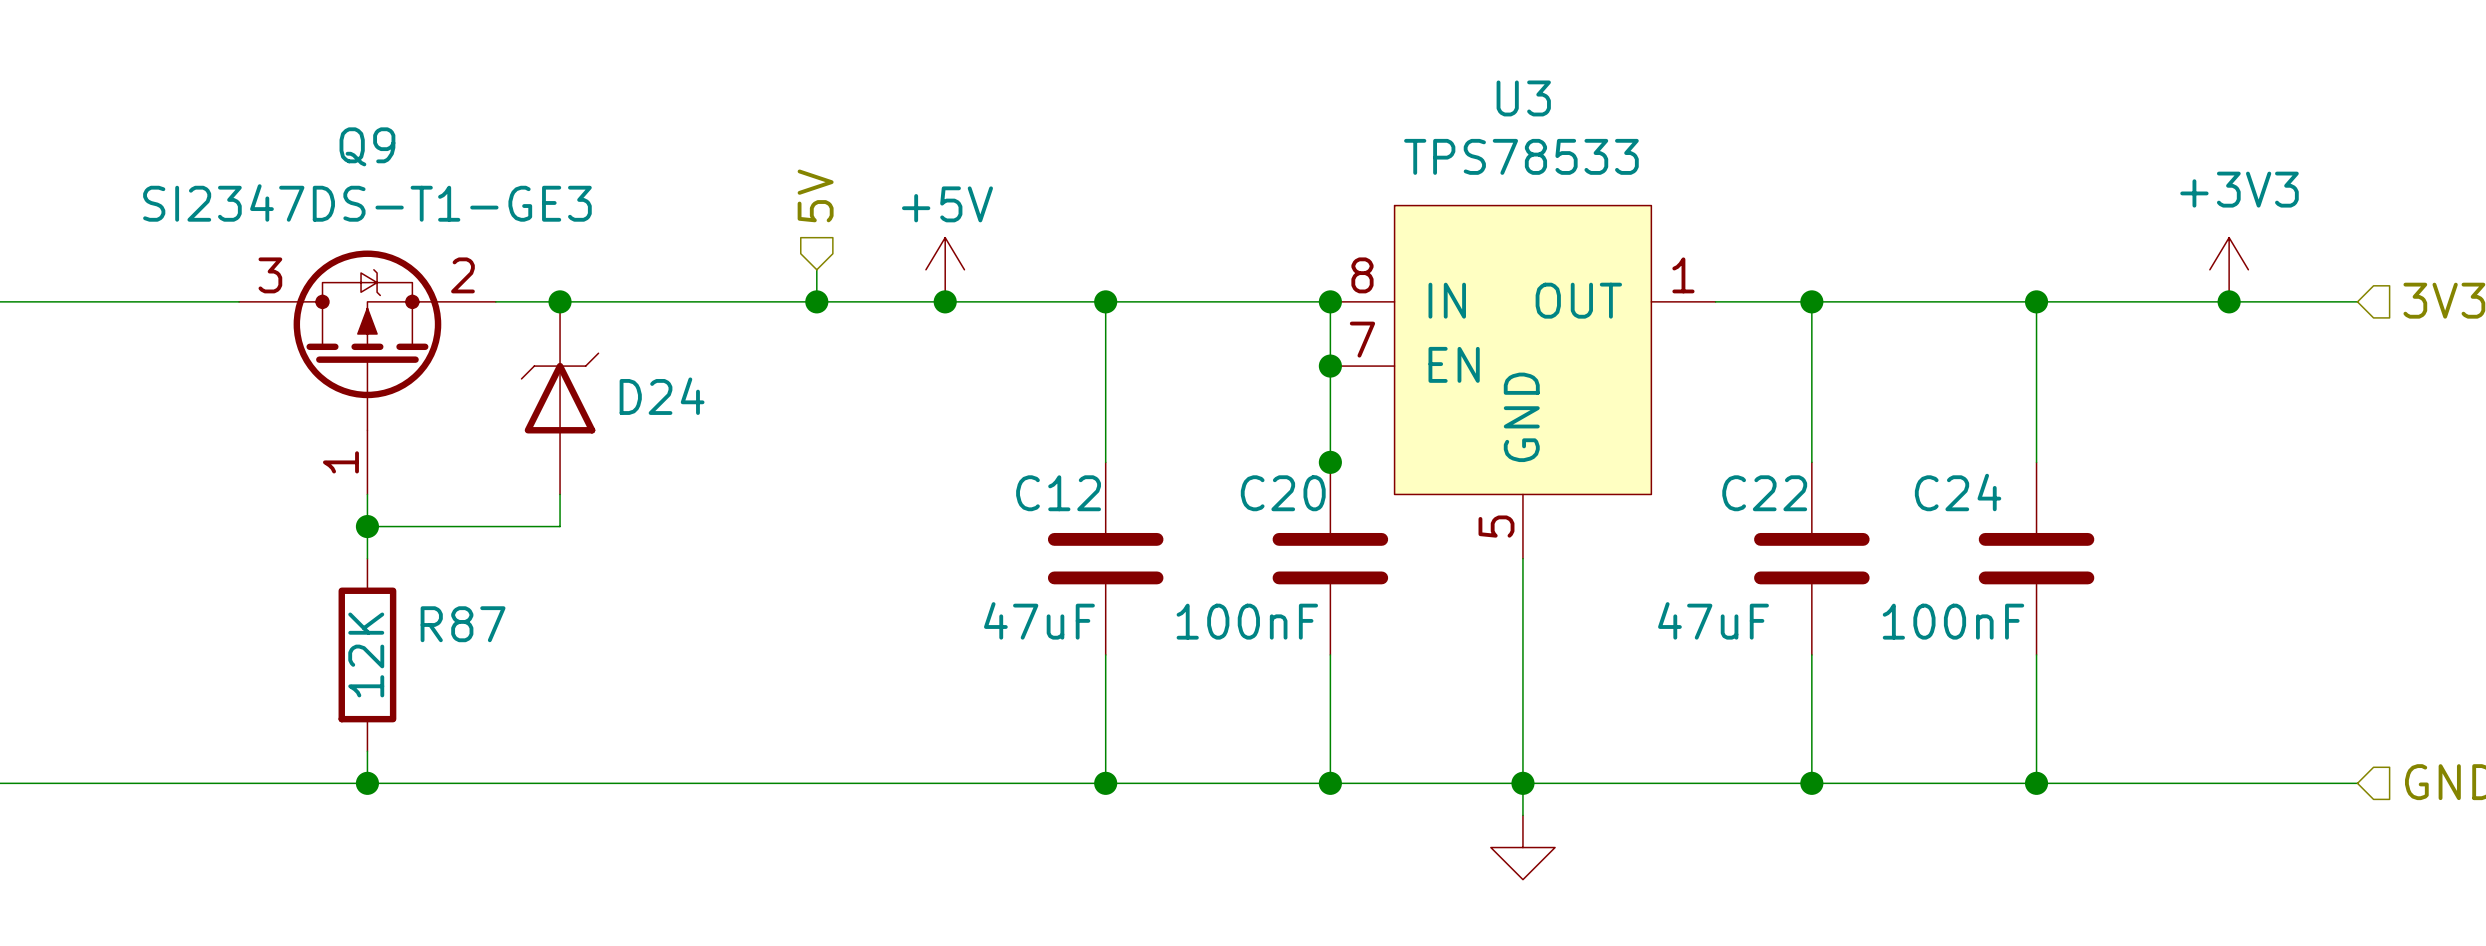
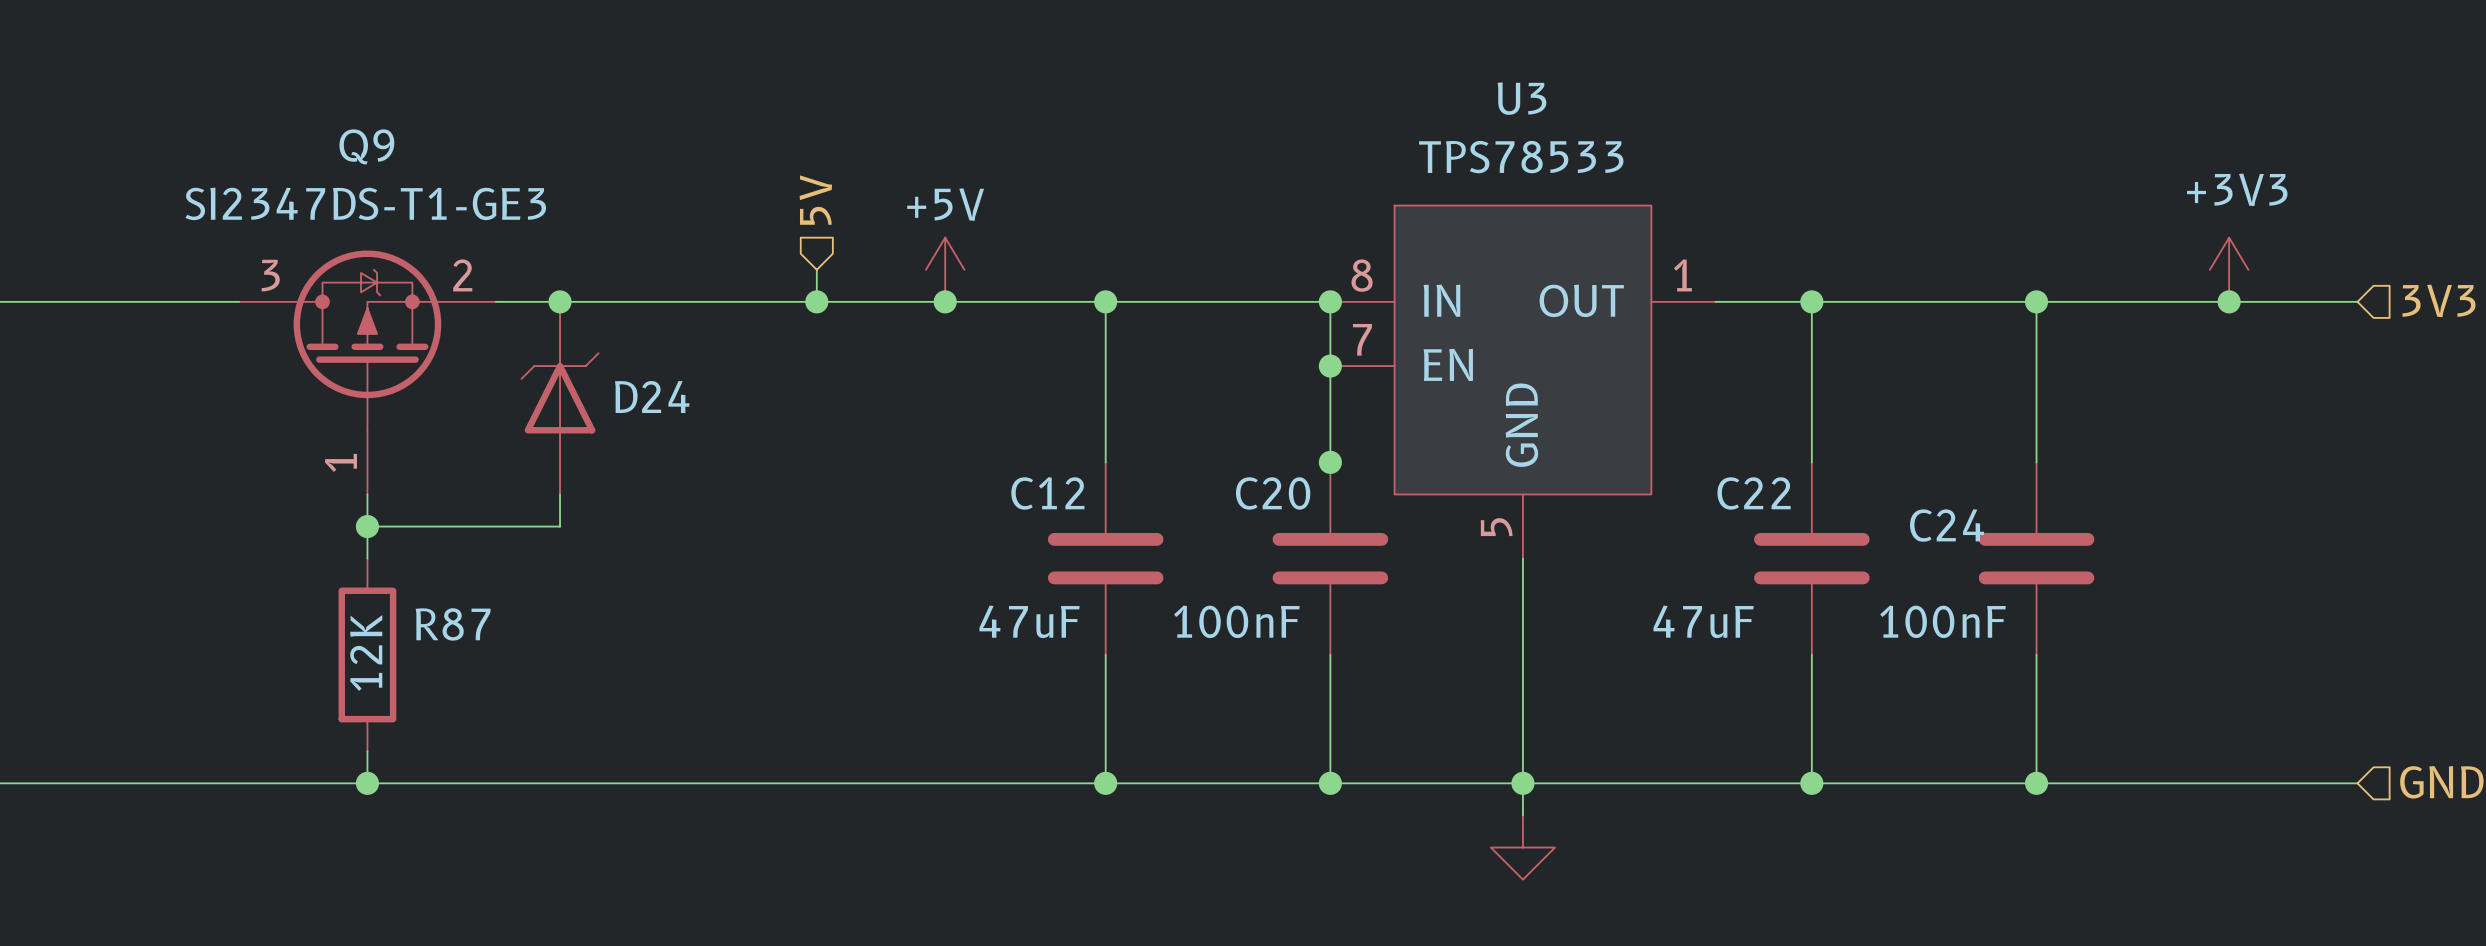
C24 name position: C24 (1958, 492) -> C24 (1947, 525)

